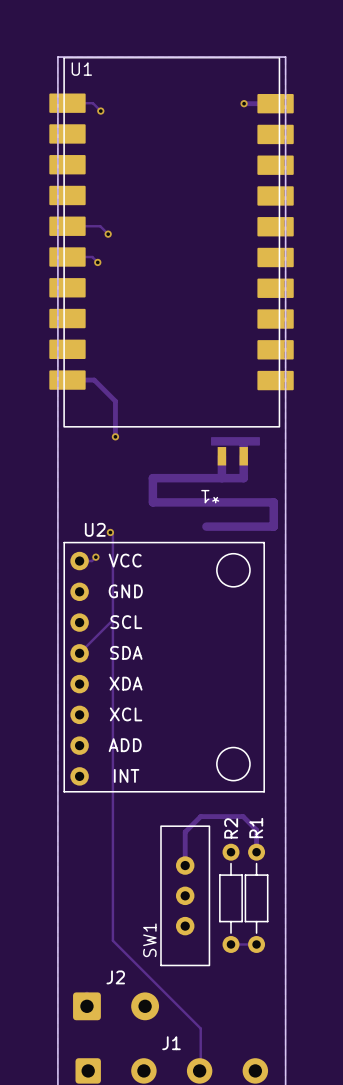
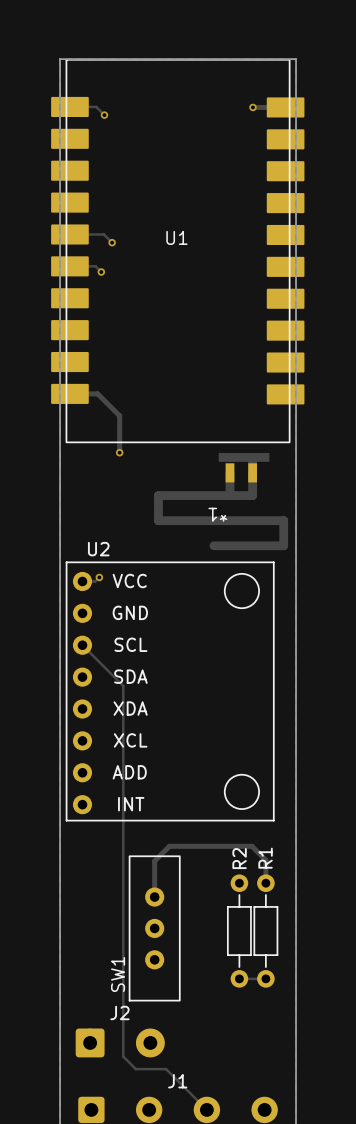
U1 name position: U1 (81, 69) -> U1 (176, 237)
track: (110, 532) (112, 534) (112, 940) (200, 1028) (200, 1069) -> none
via: (110, 532) -> none
track: (112, 620) (79, 653) -> none
track: none -> (82, 645) (123, 686) (123, 1056) (135, 1069) (166, 1069) (206, 1109)
track: (200, 816) (185, 832) (185, 865) -> (208, 846) (169, 846) (154, 861) (154, 897)
SW1 position: (185, 895) -> (154, 928)

